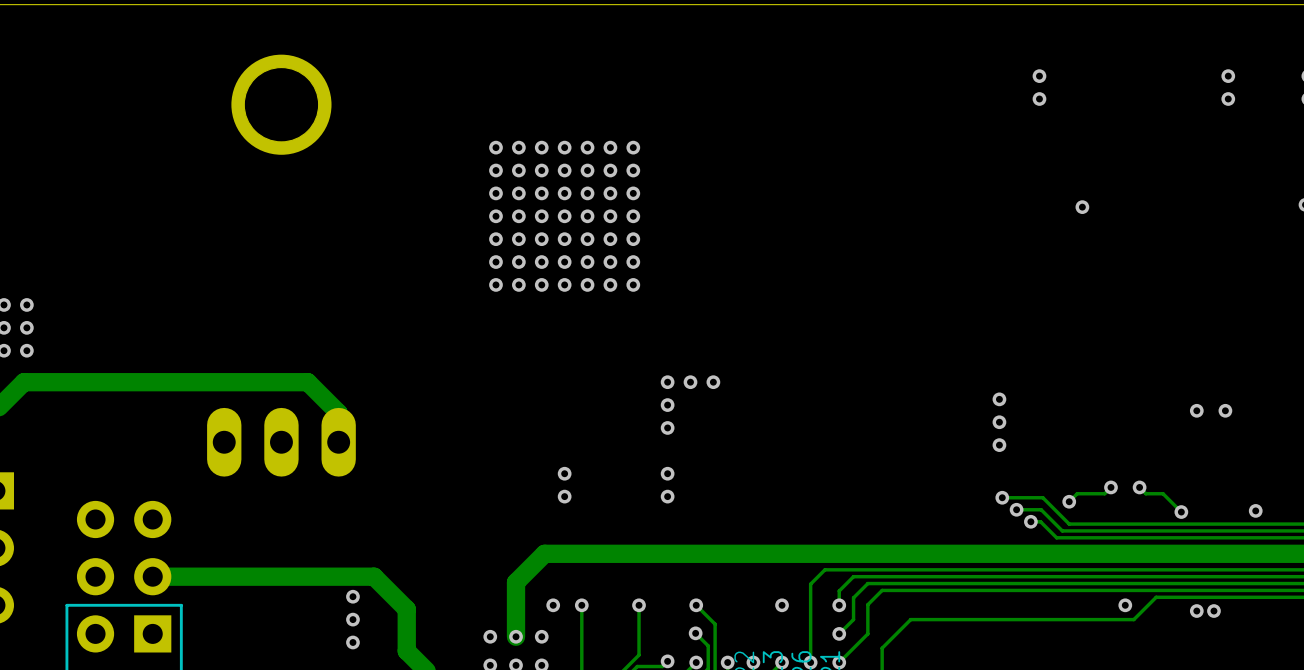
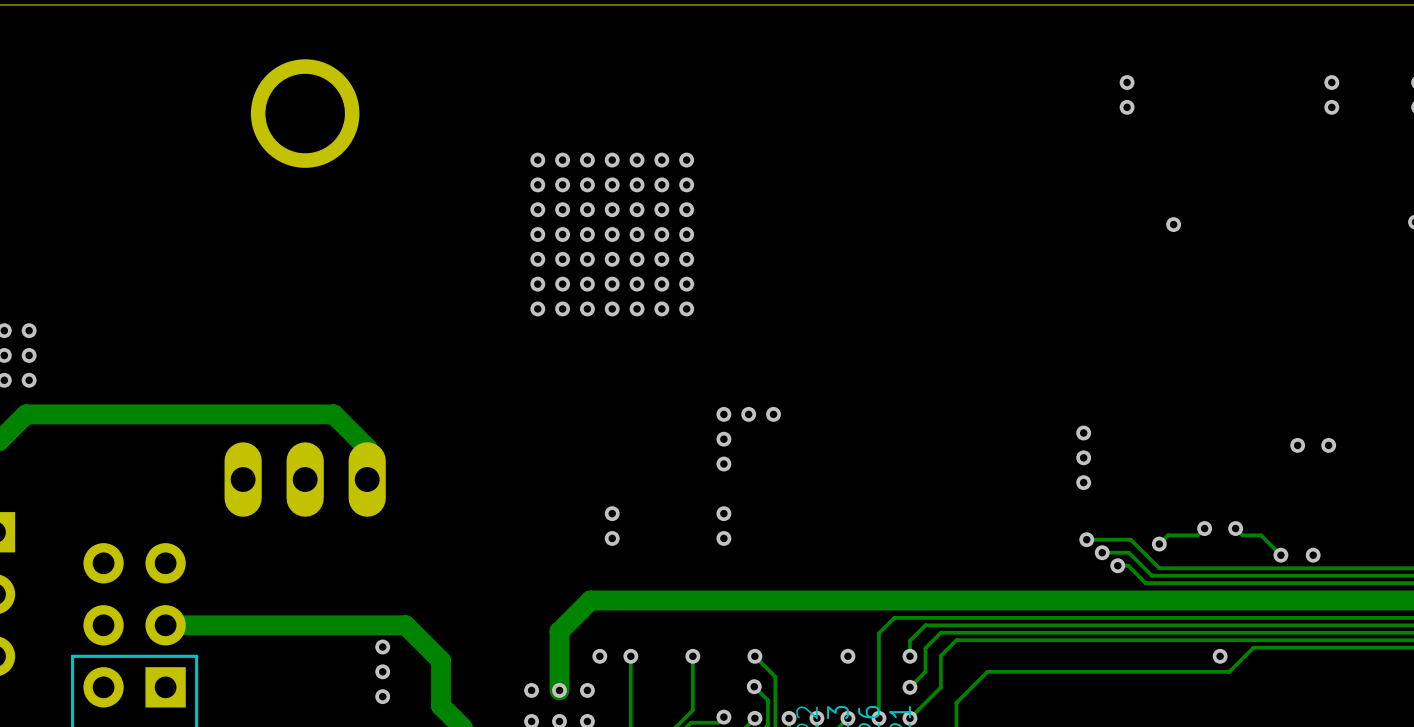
via: (1255, 510) -> none
via: none -> (1313, 555)
via: (1196, 611) -> none
via: (1213, 611) -> none

